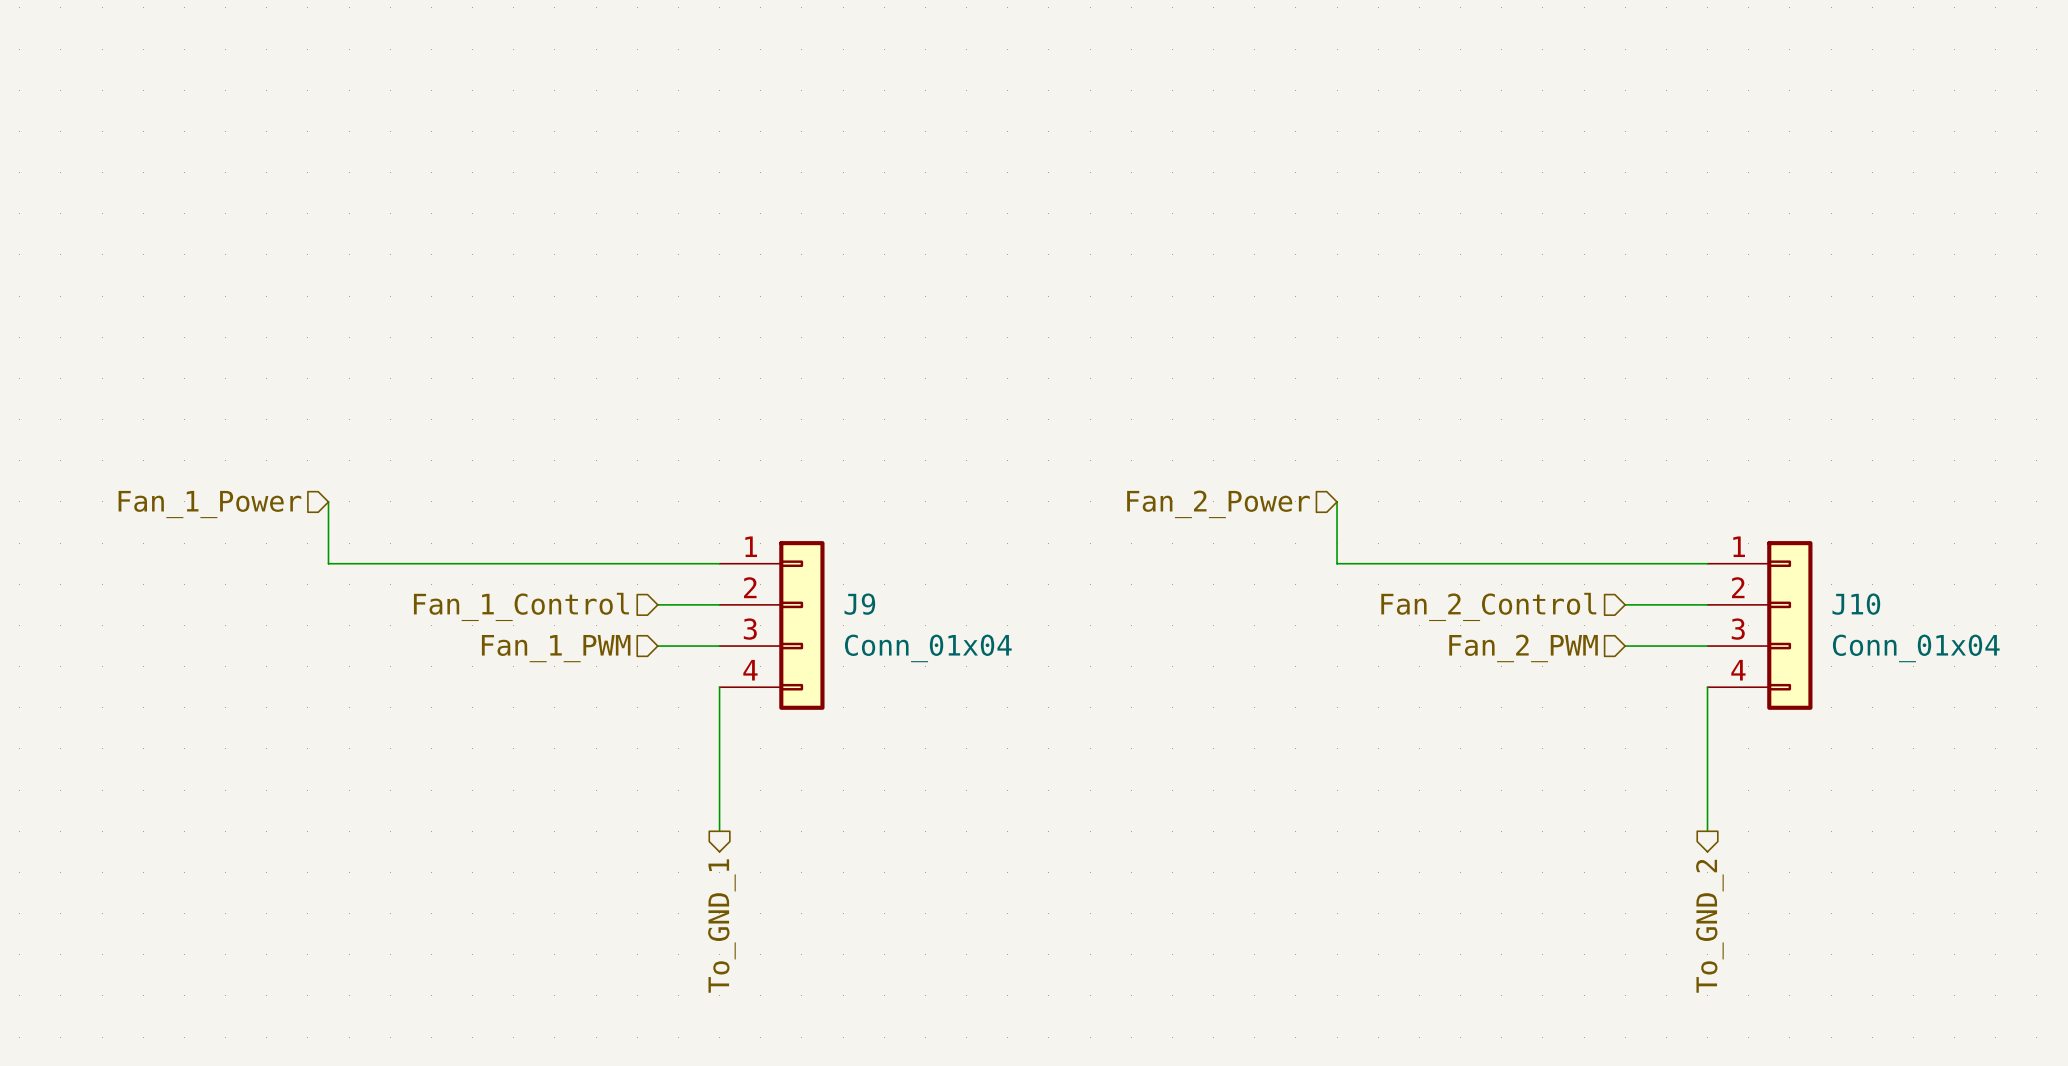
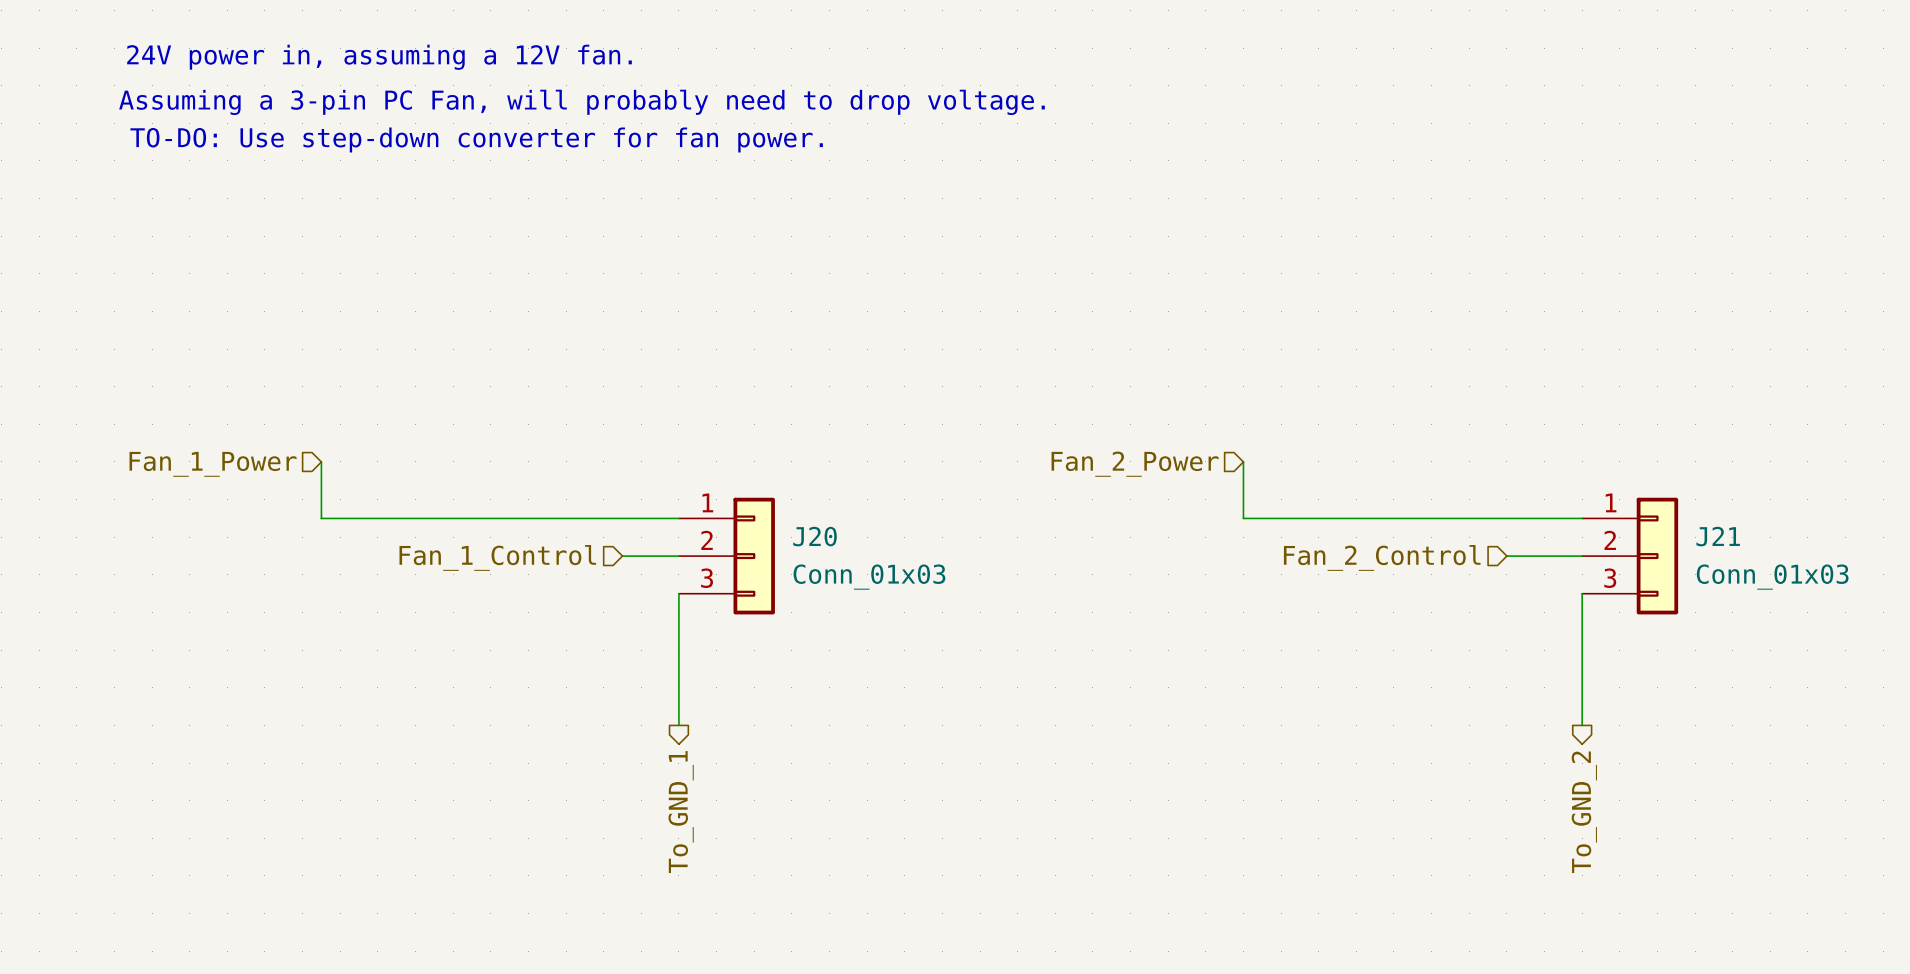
text: none -> 24V power in, assuming a 12V fan. (379, 57)
text: none -> Assuming a 3-pin PC Fan, will probably need to drop voltage. (581, 102)
text: none -> TO-DO: Use step-down converter for fan power. (476, 139)
J20: none -> Conn_01x03 (726, 556)
J21: none -> Conn_01x03 (1630, 556)
J9: Conn_01x04 (772, 625) -> none
J10: Conn_01x04 (1759, 625) -> none
wire: (657, 646) (719, 646) -> (678, 631) (678, 593)
wire: (1625, 646) (1707, 646) -> (1582, 631) (1582, 593)
hierarchical label: Fan_1_PWM (556, 648) -> none
hierarchical label: Fan_2_PWM (1523, 648) -> none
wire: (719, 790) (719, 831) -> none
wire: (1707, 790) (1707, 831) -> none
hierarchical label position: To_GND_1 (721, 926) -> To_GND_1 (681, 812)
hierarchical label position: To_GND_2 (1709, 926) -> To_GND_2 (1584, 812)

